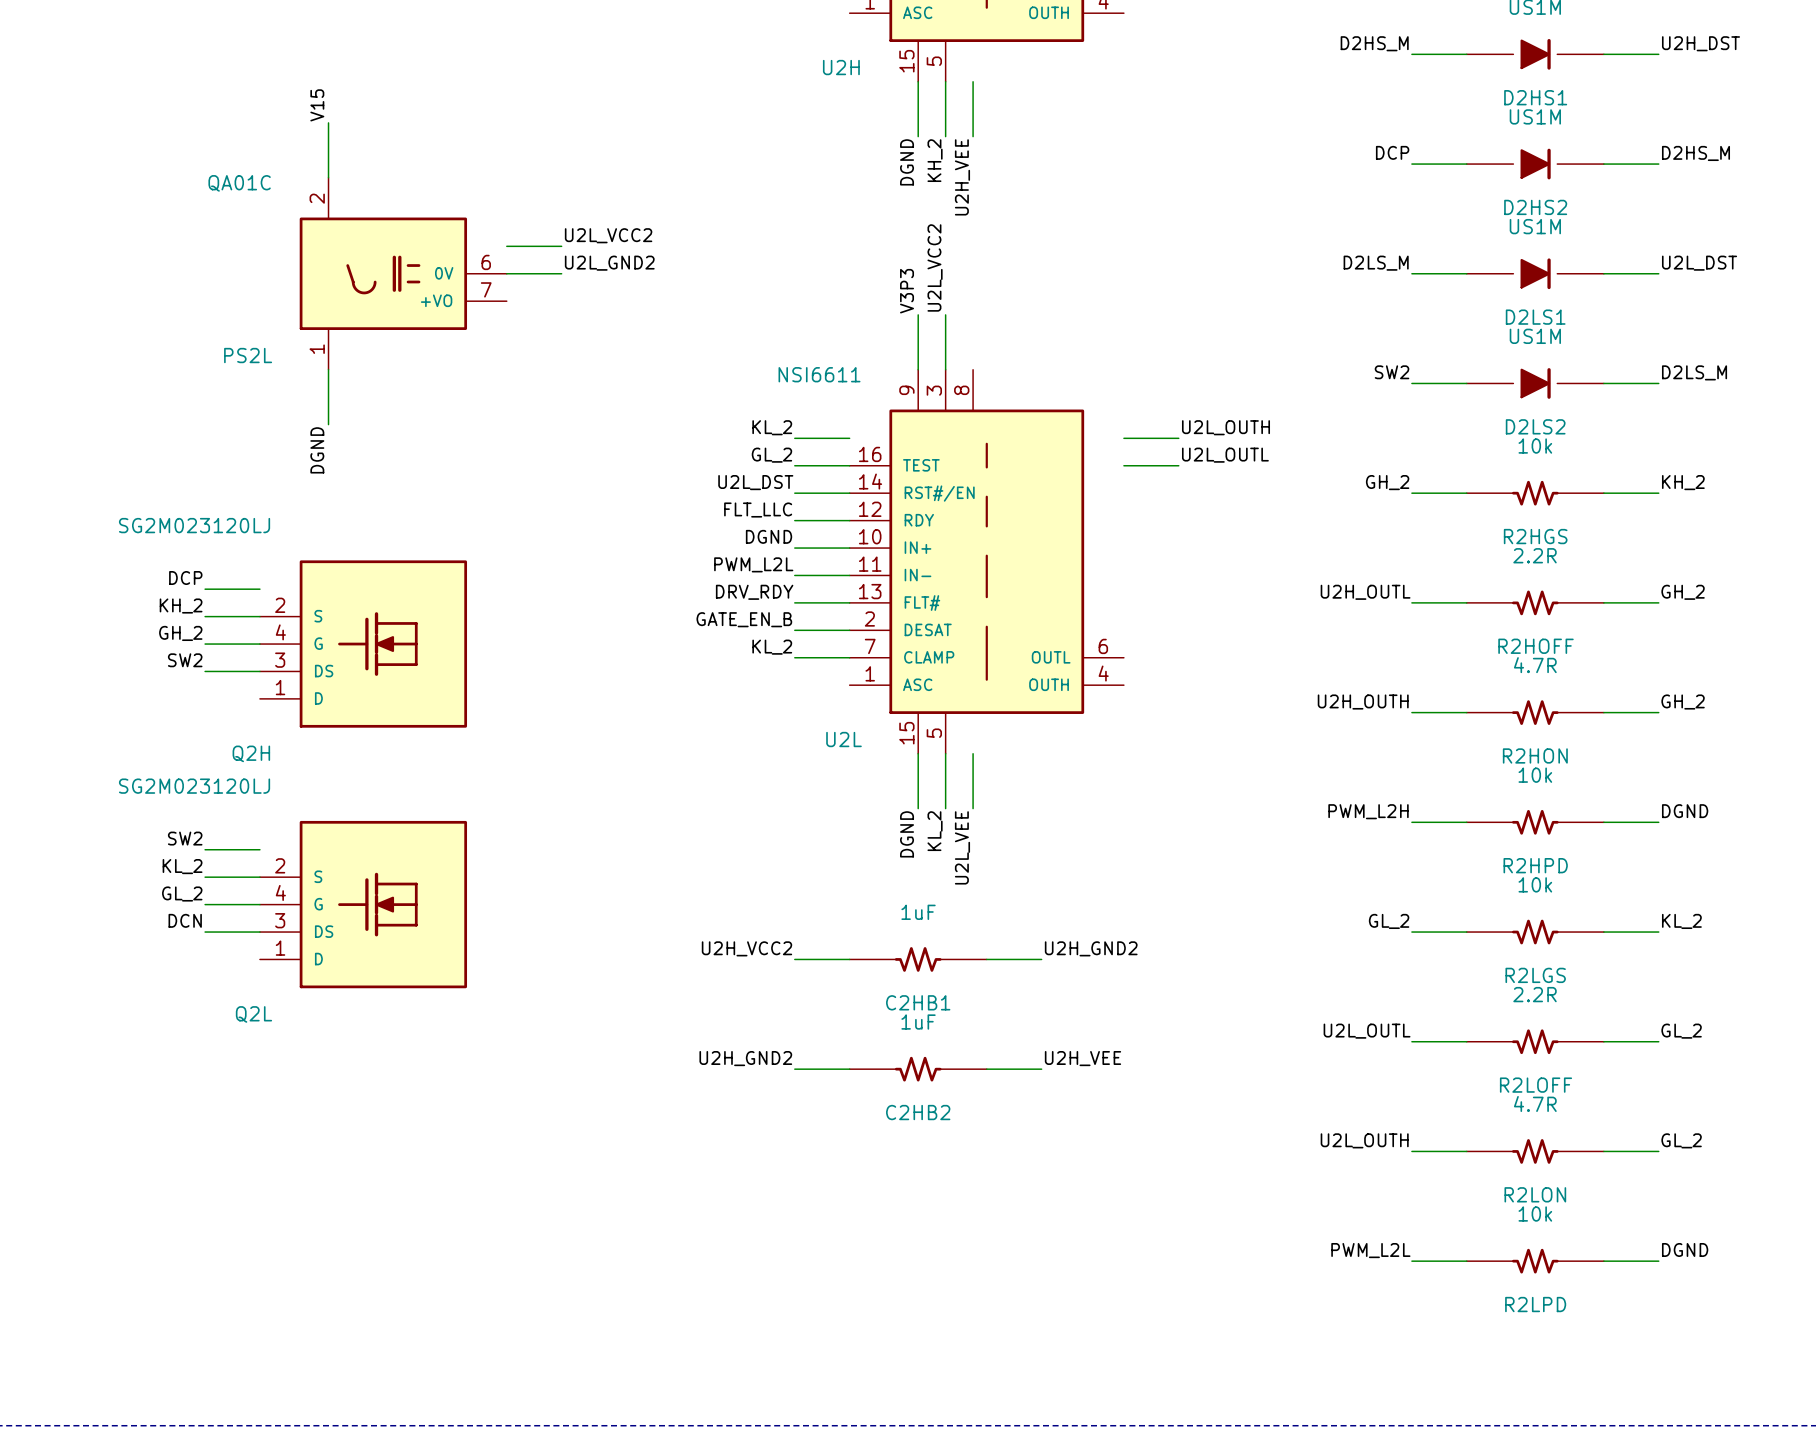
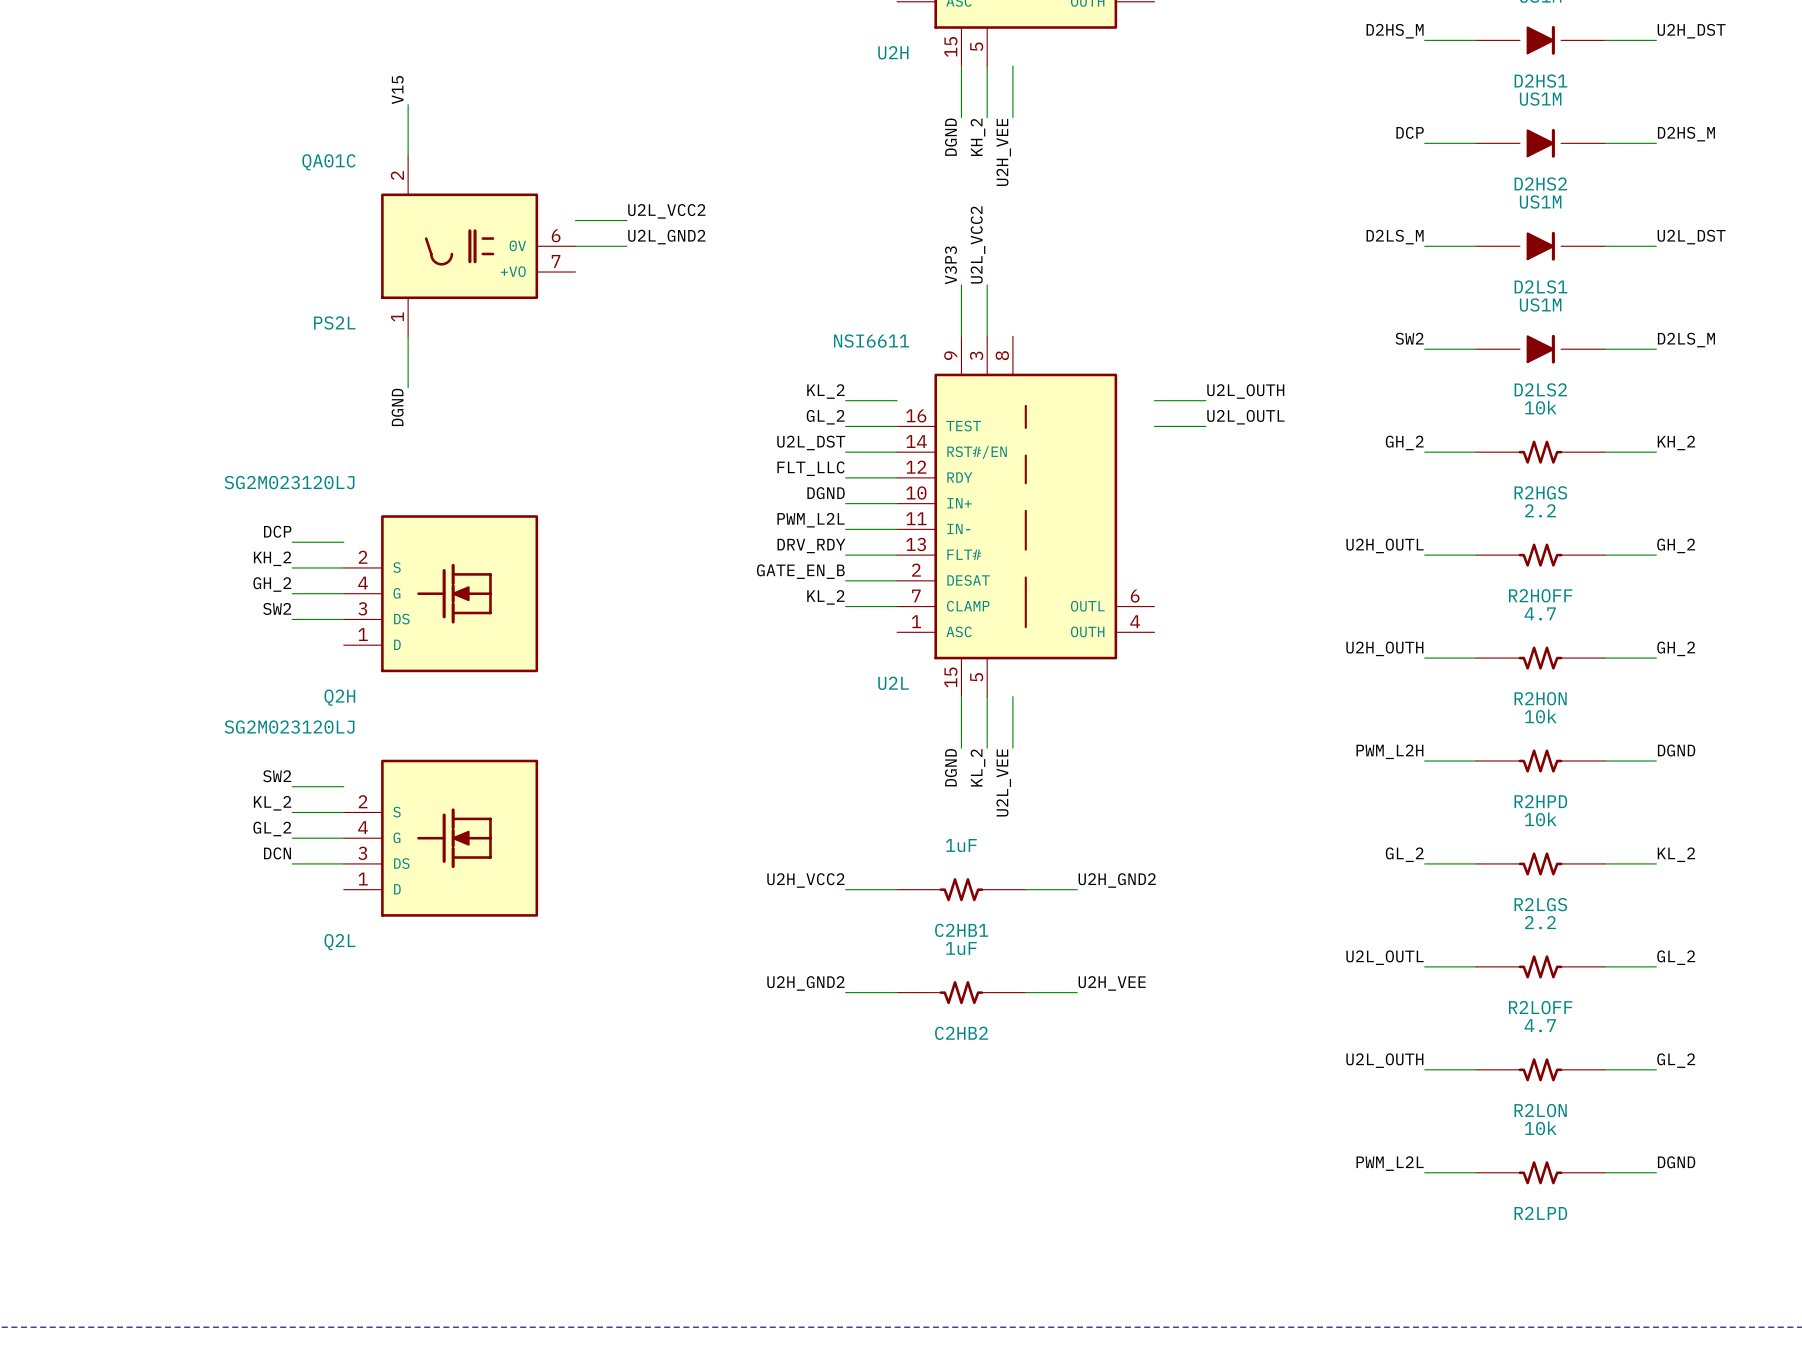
R2HOFF value: 2.2R (1535, 555) -> 2.2 (1540, 510)
R2HON value: 4.7R (1535, 665) -> 4.7 (1540, 613)
R2LOFF value: 2.2R (1535, 994) -> 2.2 (1540, 922)
R2LON value: 4.7R (1535, 1103) -> 4.7 (1540, 1025)

